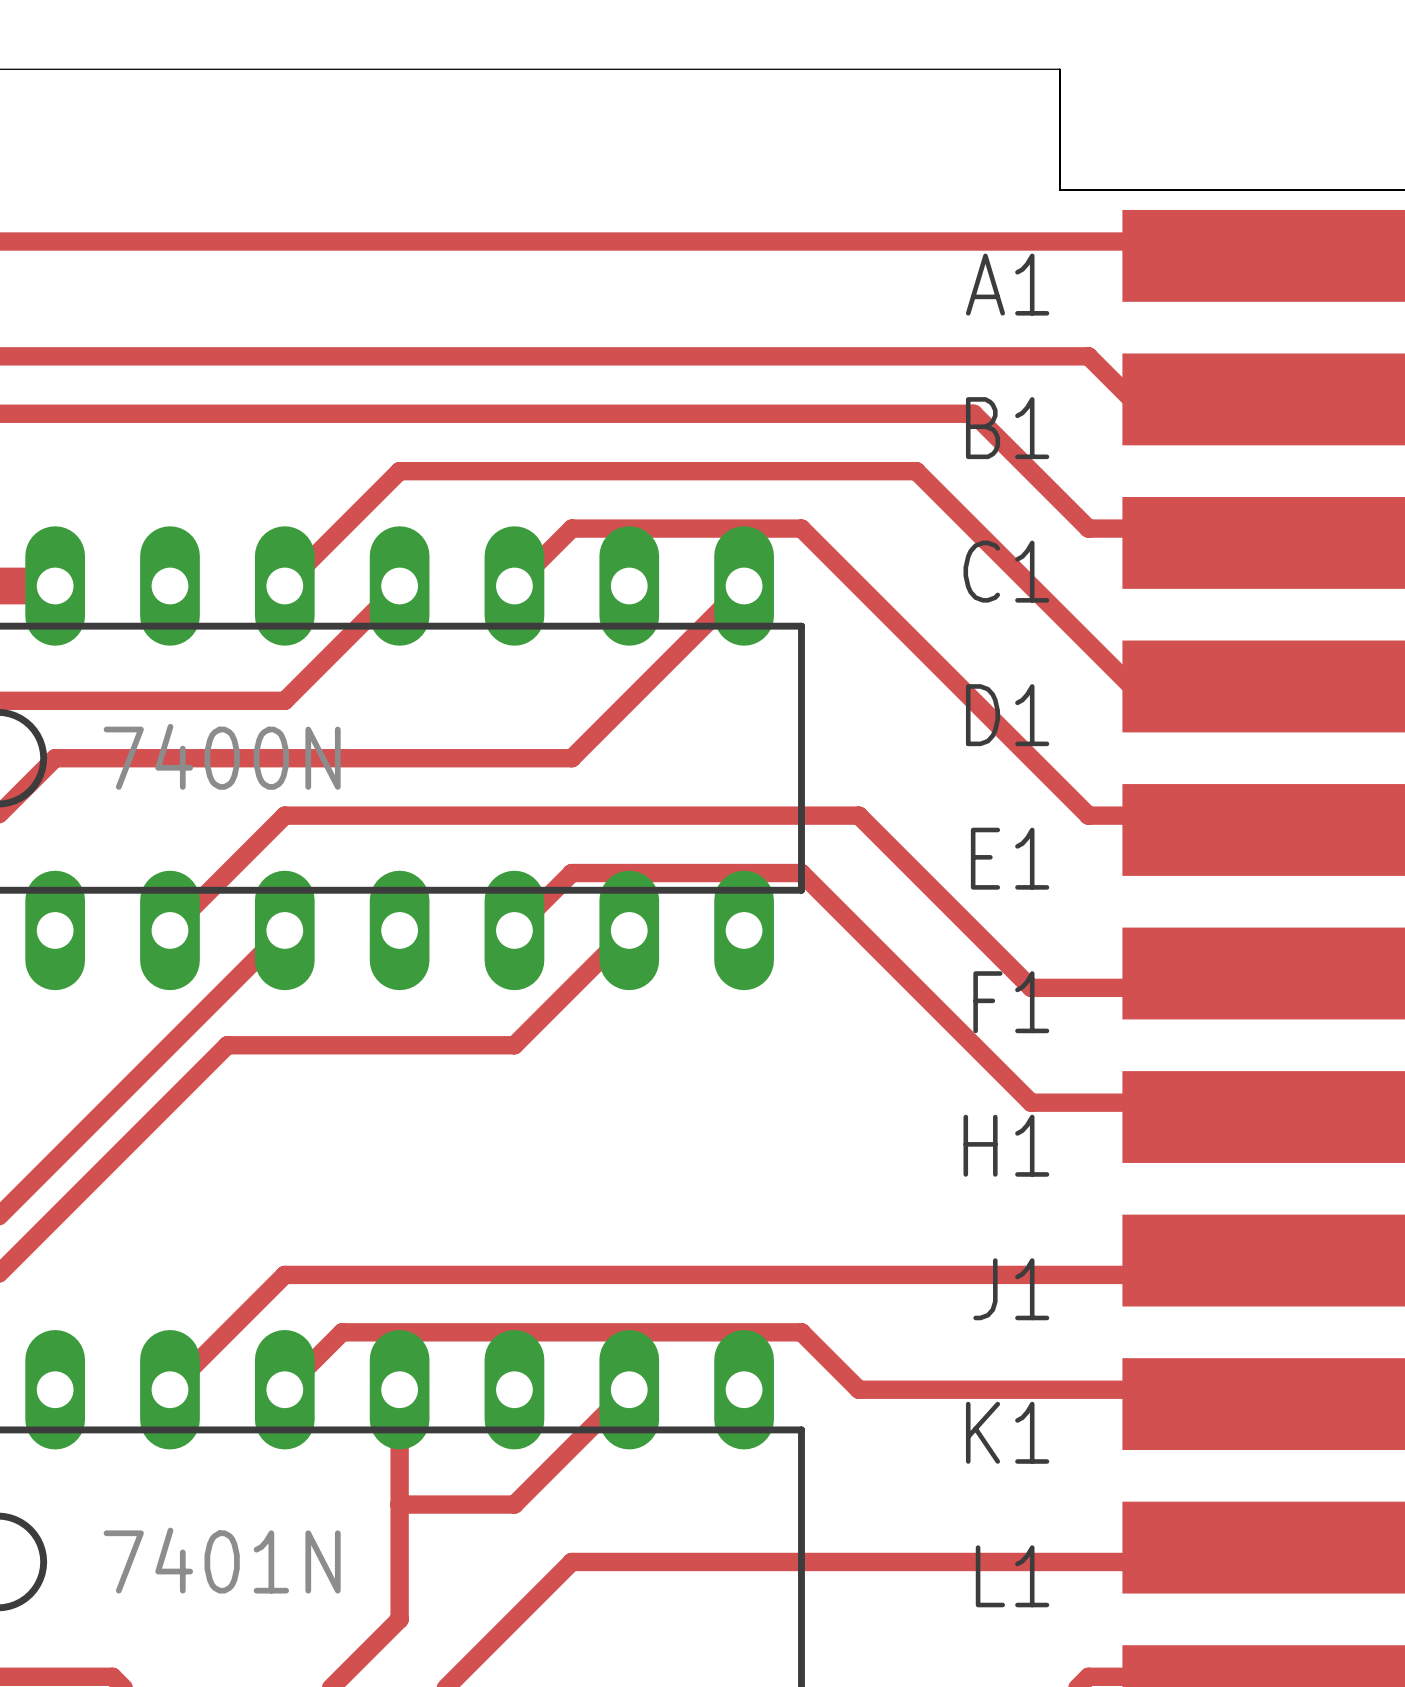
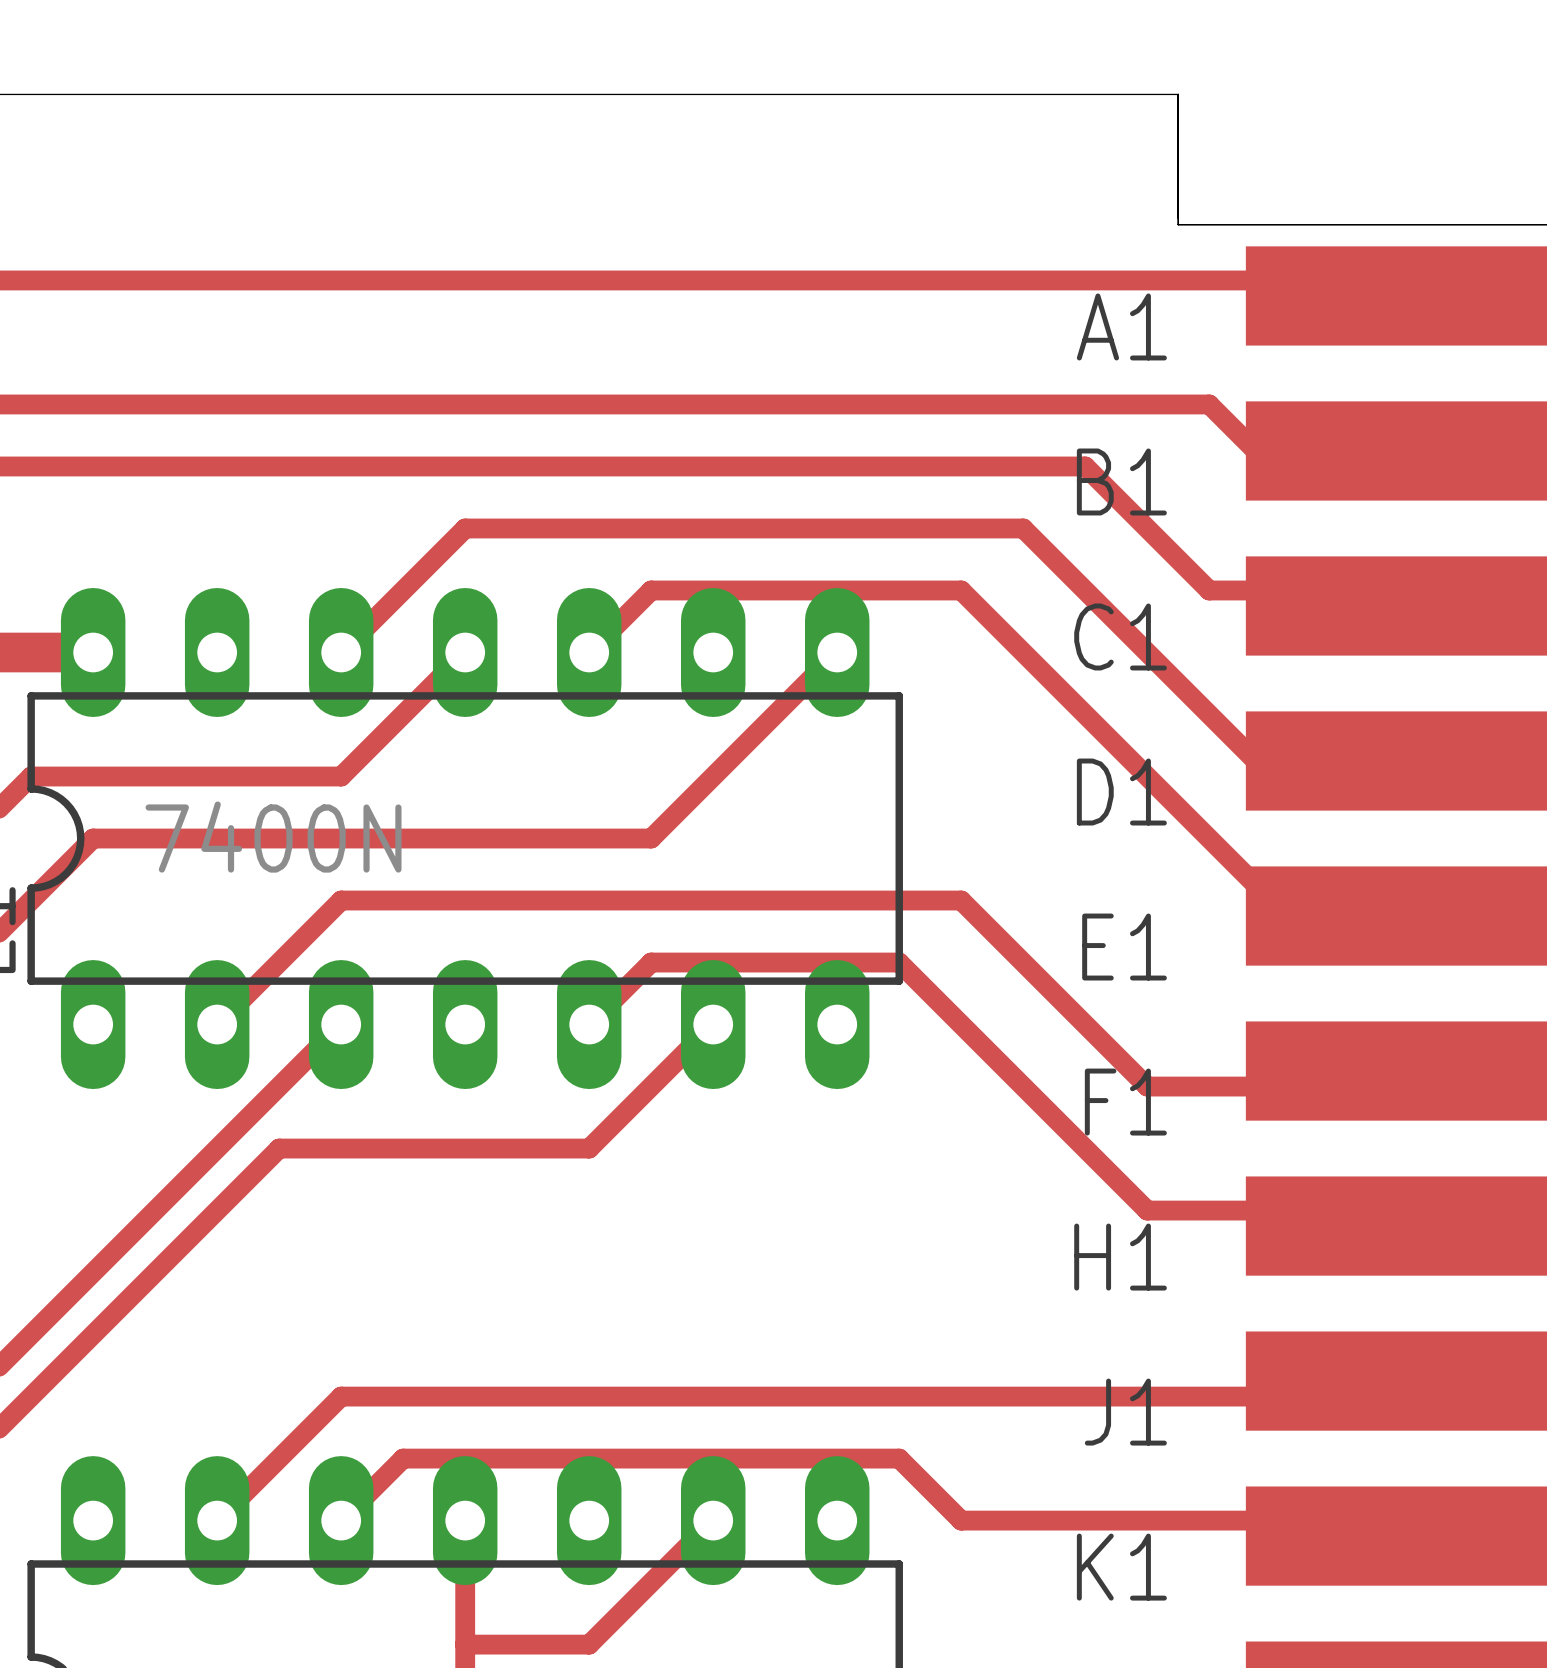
track: (801, 528) (1088, 815) (1145, 815) -> (899, 590) (961, 590) (1271, 900)

